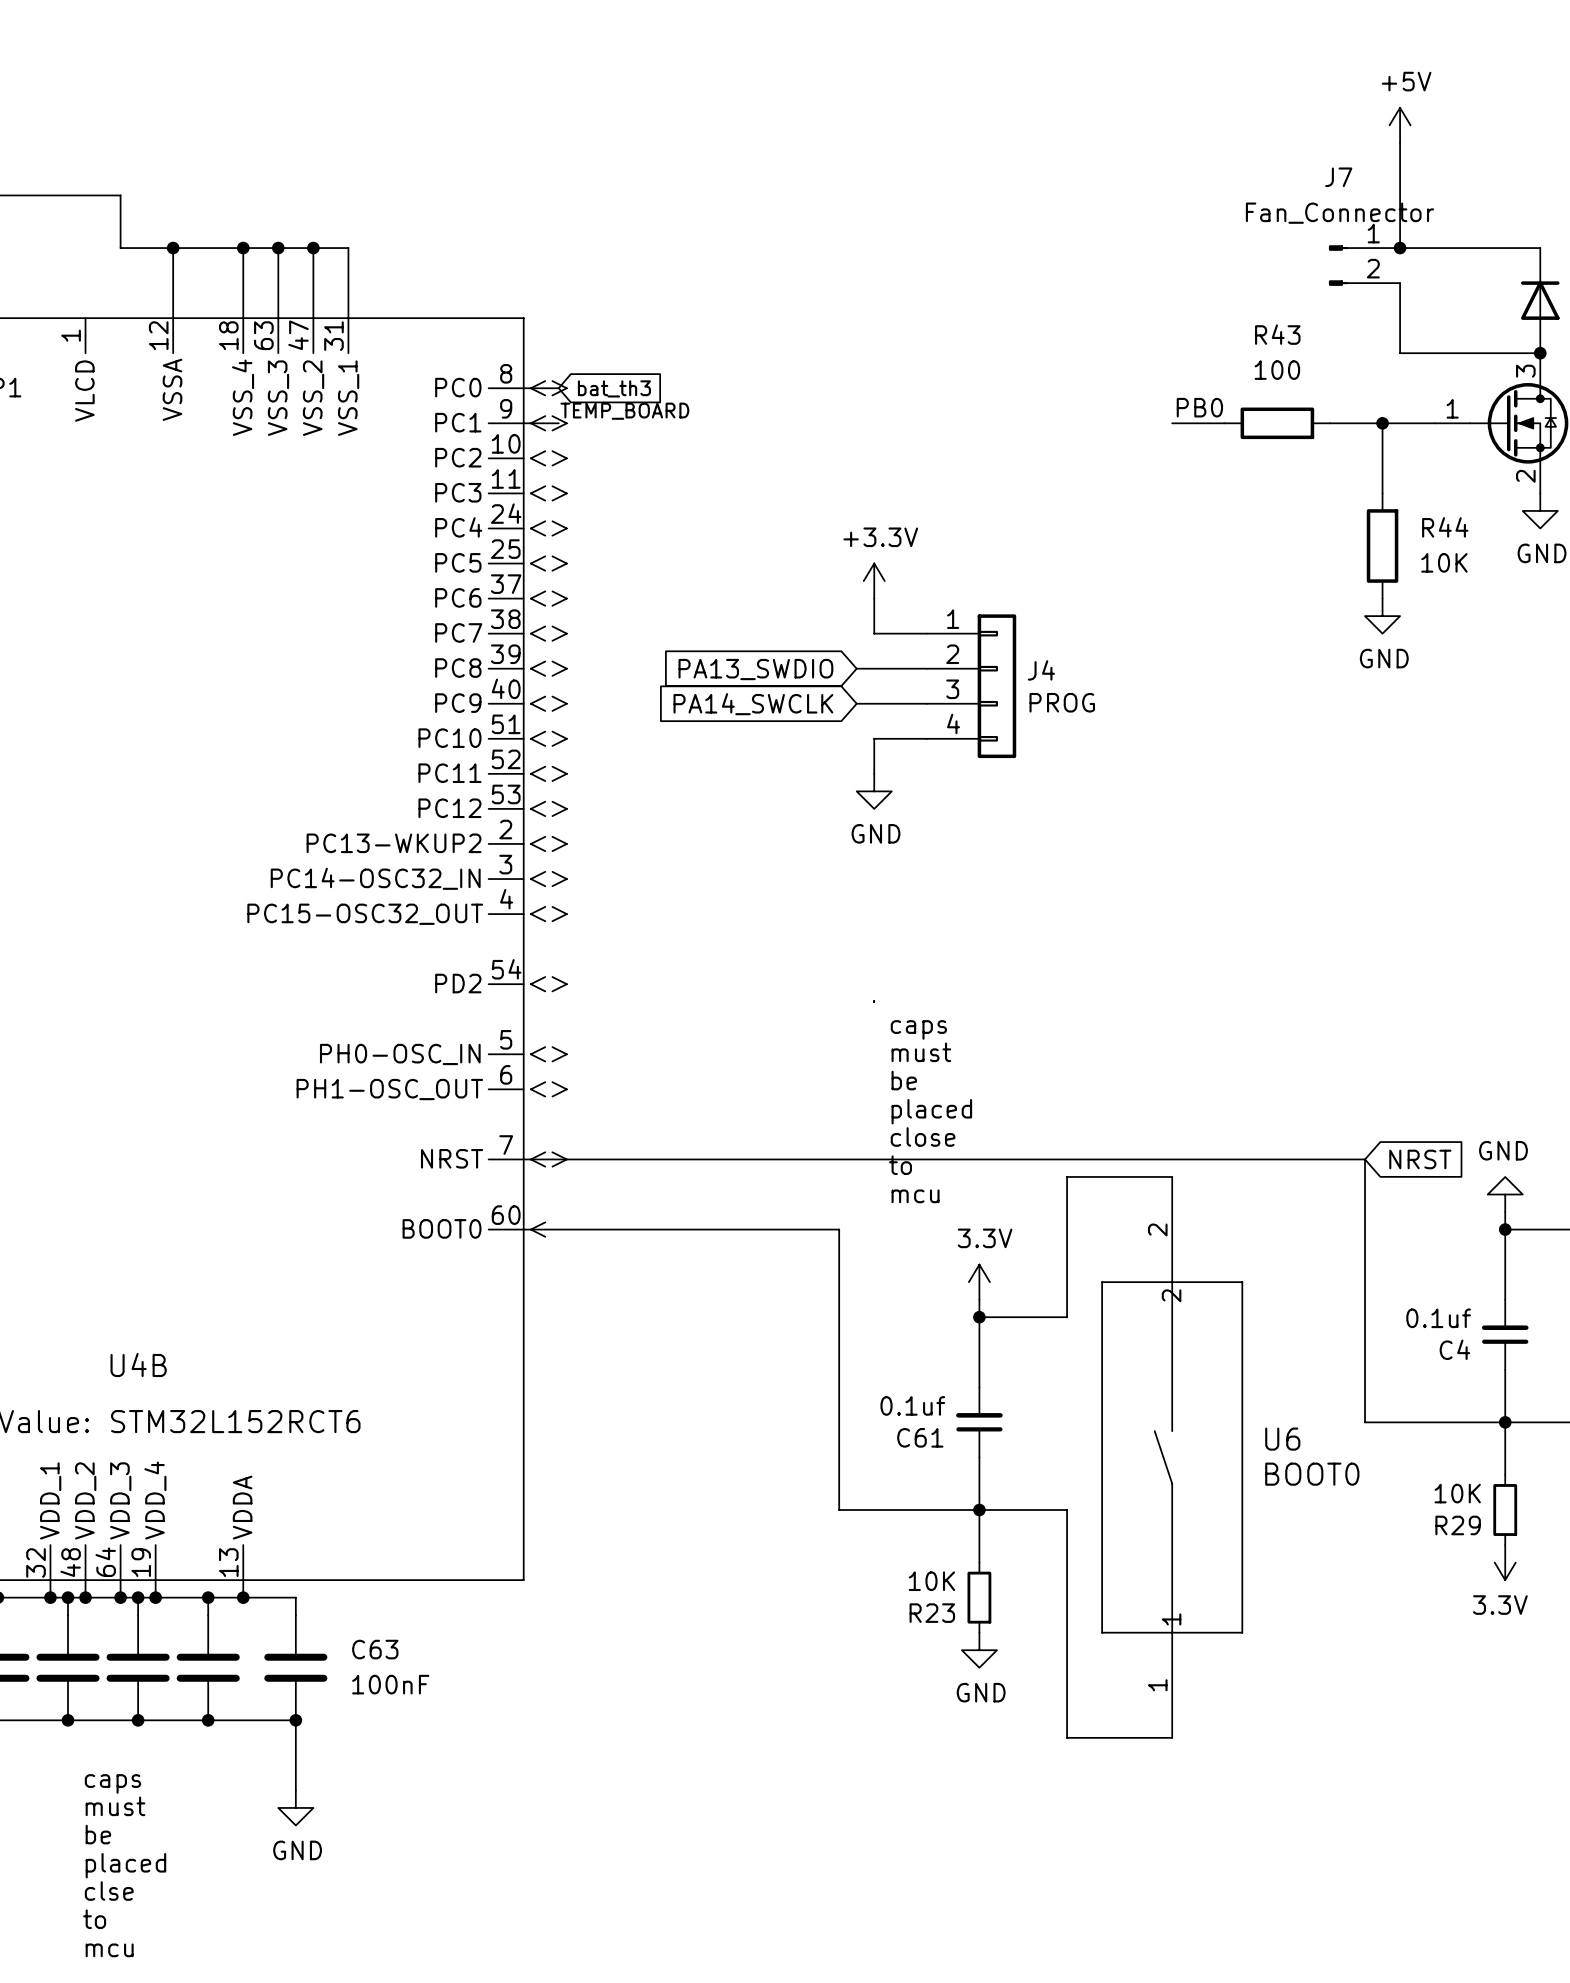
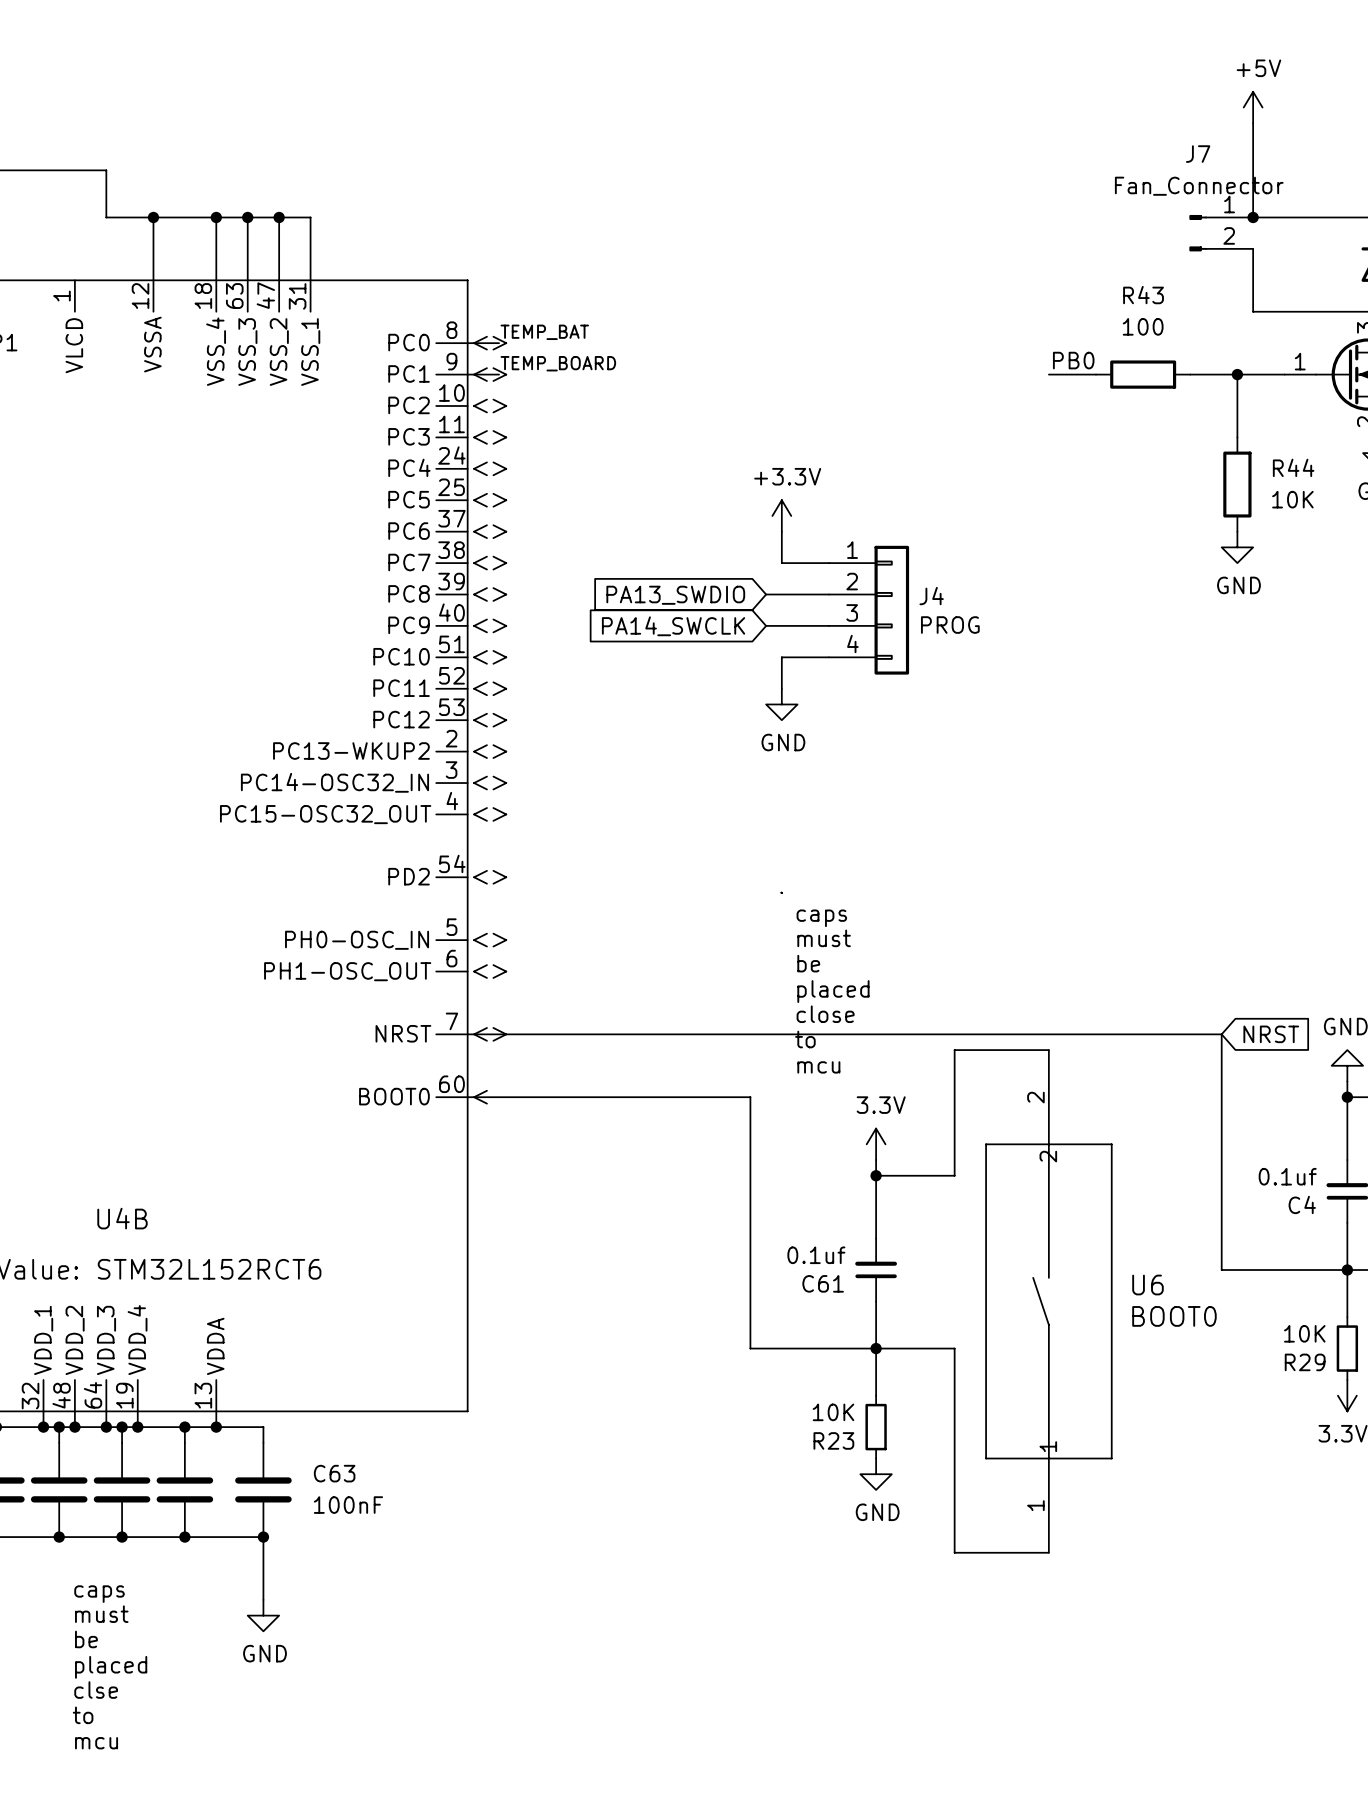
label: none -> TEMP_BAT (544, 332)
global label: bat_th3 (614, 388) -> none

